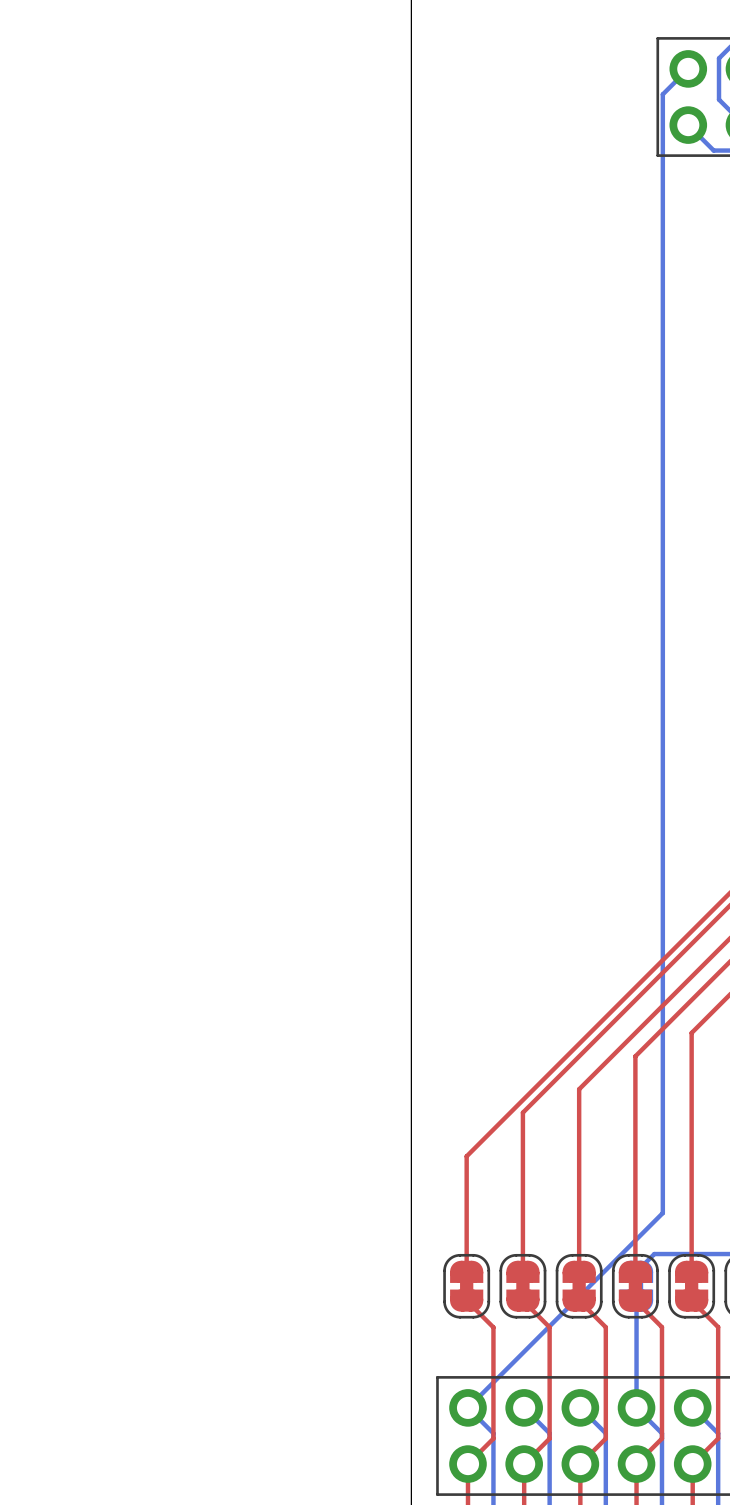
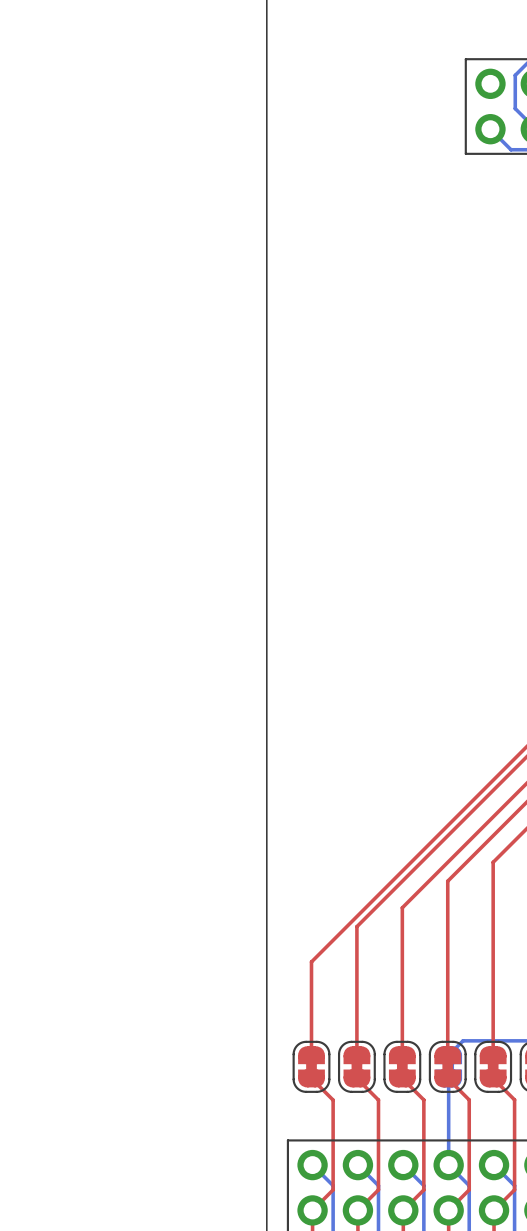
bottom track: (688, 68) (662, 94) (662, 1213) (468, 1407) -> none

